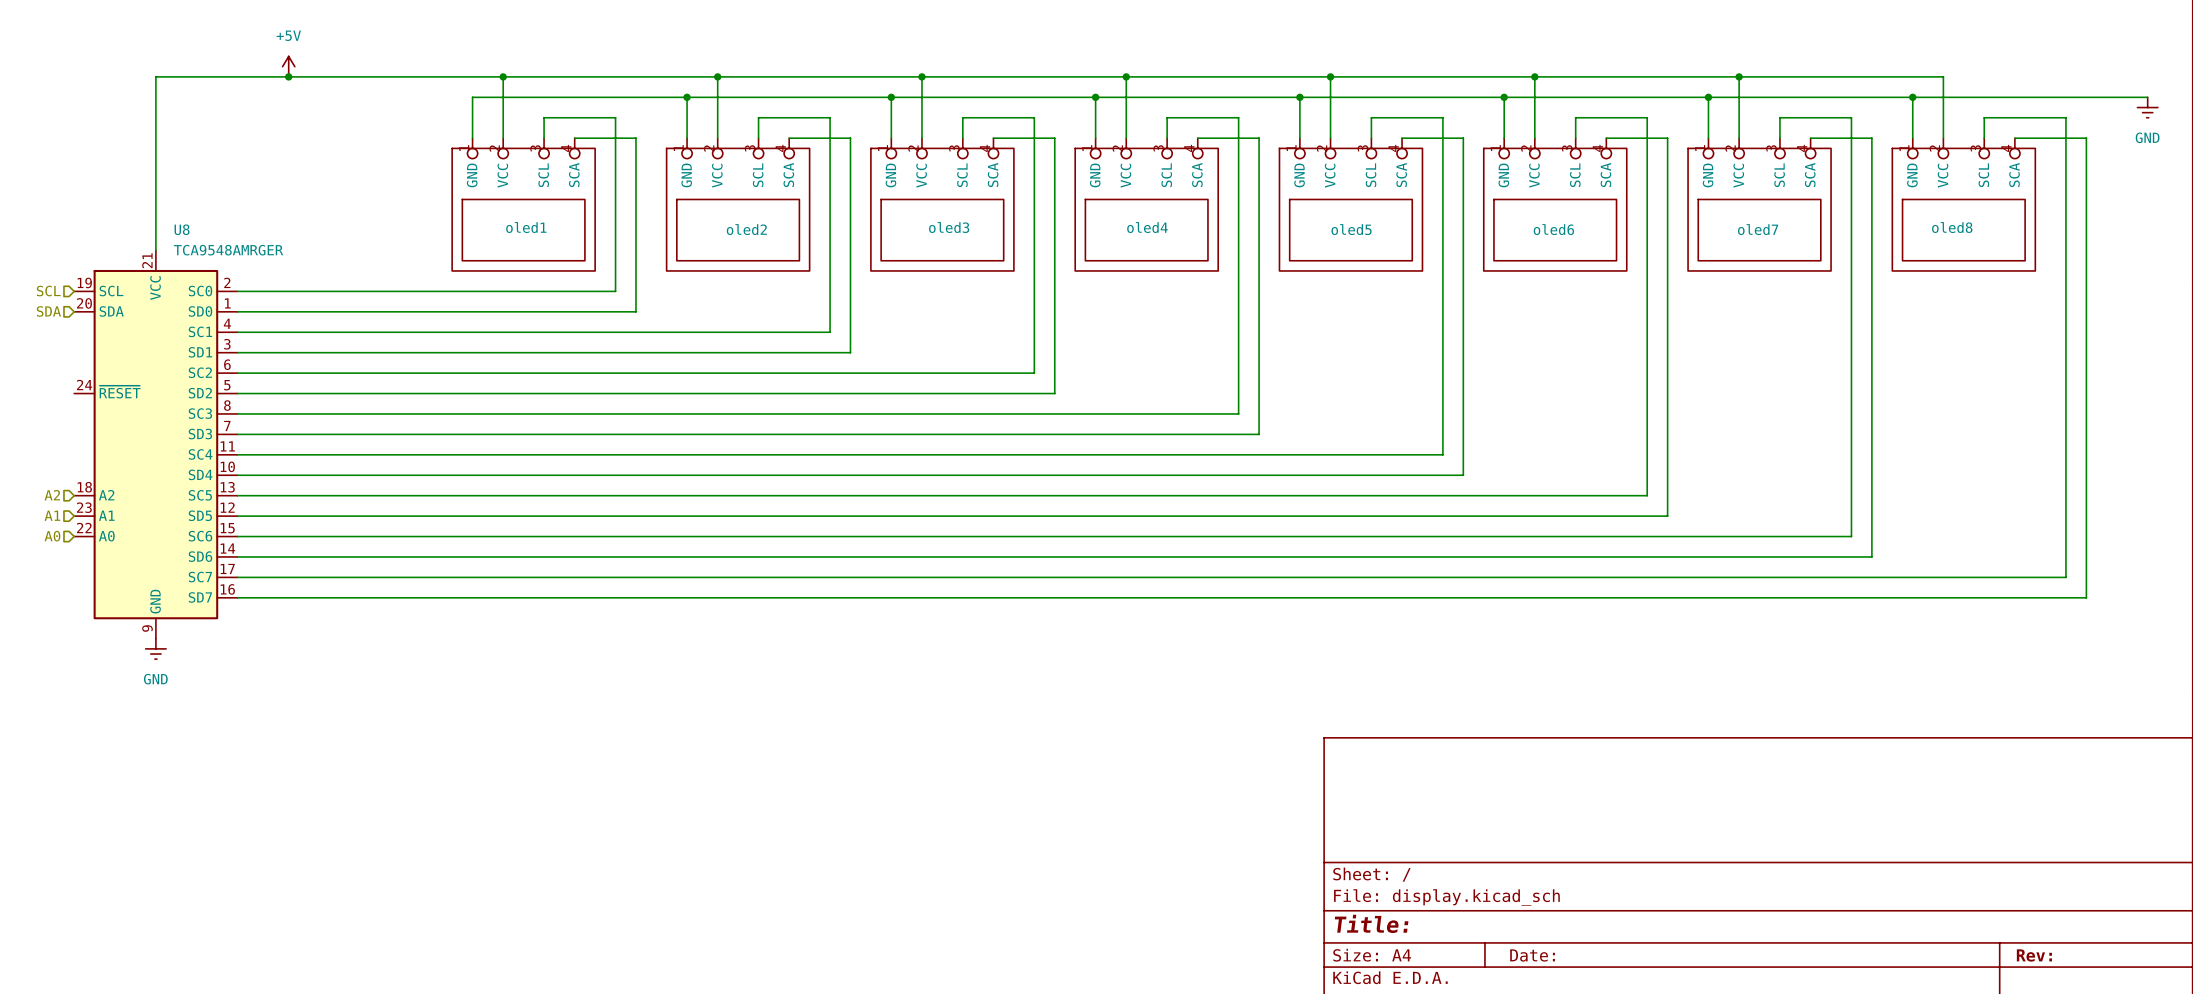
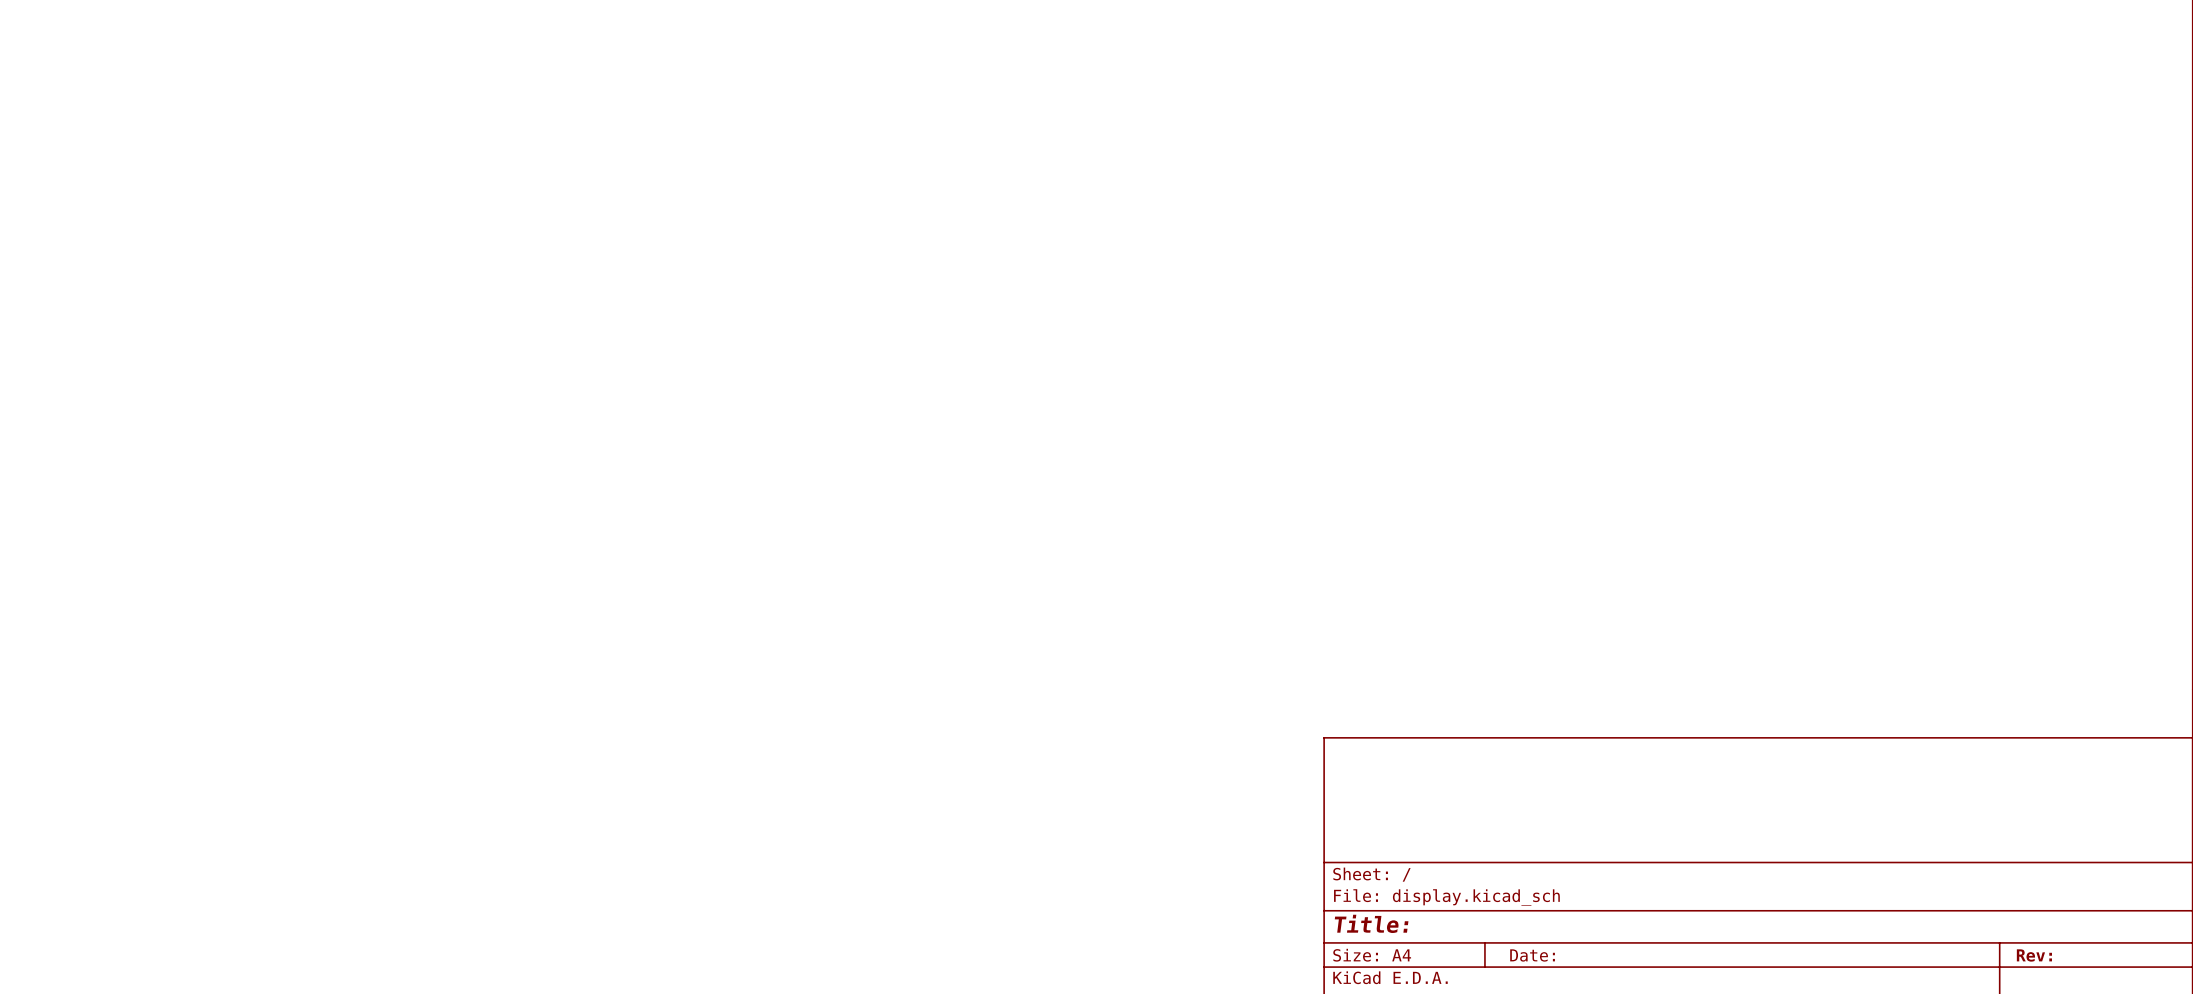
power symbol: +5V (288, 66) -> none
junction: (288, 76) -> none
wire: (503, 76) (503, 138) -> none
junction: (503, 76) -> none
wire: (717, 76) (717, 138) -> none
junction: (717, 76) -> none
wire: (921, 76) (921, 138) -> none
junction: (921, 76) -> none
wire: (1126, 76) (1126, 138) -> none
junction: (1126, 76) -> none
wire: (1330, 76) (1330, 138) -> none
junction: (1330, 76) -> none
wire: (1534, 76) (1534, 138) -> none
junction: (1534, 76) -> none
wire: (1739, 76) (1739, 138) -> none
junction: (1739, 76) -> none
wire: (687, 97) (687, 138) -> none
junction: (687, 97) -> none
wire: (891, 97) (891, 138) -> none
junction: (891, 97) -> none
wire: (1095, 97) (1095, 138) -> none
junction: (1095, 97) -> none
wire: (1299, 97) (1299, 138) -> none
junction: (1299, 97) -> none
wire: (1504, 97) (1504, 138) -> none
junction: (1504, 97) -> none
wire: (1708, 97) (1708, 138) -> none
junction: (1708, 97) -> none
wire: (1912, 97) (1912, 138) -> none
junction: (1912, 97) -> none
wire: (2147, 97) (472, 97) (472, 138) -> none
power symbol: GND (2147, 107) -> none
wire: (544, 138) (544, 117) (615, 117) (615, 291) (237, 291) -> none
wire: (574, 138) (635, 138) (635, 311) (237, 311) -> none
wire: (758, 138) (758, 117) (830, 117) (830, 332) (237, 332) -> none
wire: (789, 138) (850, 138) (850, 352) (237, 352) -> none
wire: (962, 138) (962, 117) (1034, 117) (1034, 373) (237, 373) -> none
wire: (993, 138) (1054, 138) (1054, 393) (237, 393) -> none
wire: (1167, 138) (1167, 117) (1238, 117) (1238, 413) (237, 413) -> none
wire: (1197, 138) (1259, 138) (1259, 434) (237, 434) -> none
wire: (1371, 138) (1371, 117) (1442, 117) (1442, 454) (237, 454) -> none
wire: (1402, 138) (1463, 138) (1463, 475) (237, 475) -> none
wire: (1575, 138) (1575, 117) (1647, 117) (1647, 495) (237, 495) -> none
wire: (1606, 138) (1667, 138) (1667, 516) (237, 516) -> none
wire: (1779, 138) (1779, 117) (1851, 117) (1851, 536) (237, 536) -> none
wire: (1810, 138) (1871, 138) (1871, 556) (237, 556) -> none
wire: (1943, 138) (1943, 76) (155, 76) (155, 250) -> none
wire: (1984, 138) (1984, 117) (2065, 117) (2065, 577) (237, 577) -> none
wire: (2014, 138) (2086, 138) (2086, 597) (237, 597) -> none
oled1: (523, 204) -> none
oled2: (738, 204) -> none
oled3: (942, 204) -> none
oled4: (1146, 204) -> none
oled5: (1350, 204) -> none
oled6: (1555, 204) -> none
oled7: (1759, 204) -> none
oled8: (1963, 204) -> none
hierarchical label: SCL (48, 291) -> none
hierarchical label: SDA (48, 311) -> none
U8: TCA9548AMRGER (155, 444) -> none
hierarchical label: A2 (52, 495) -> none
hierarchical label: A1 (52, 515) -> none
hierarchical label: A0 (52, 536) -> none
power symbol: GND (155, 648) -> none

